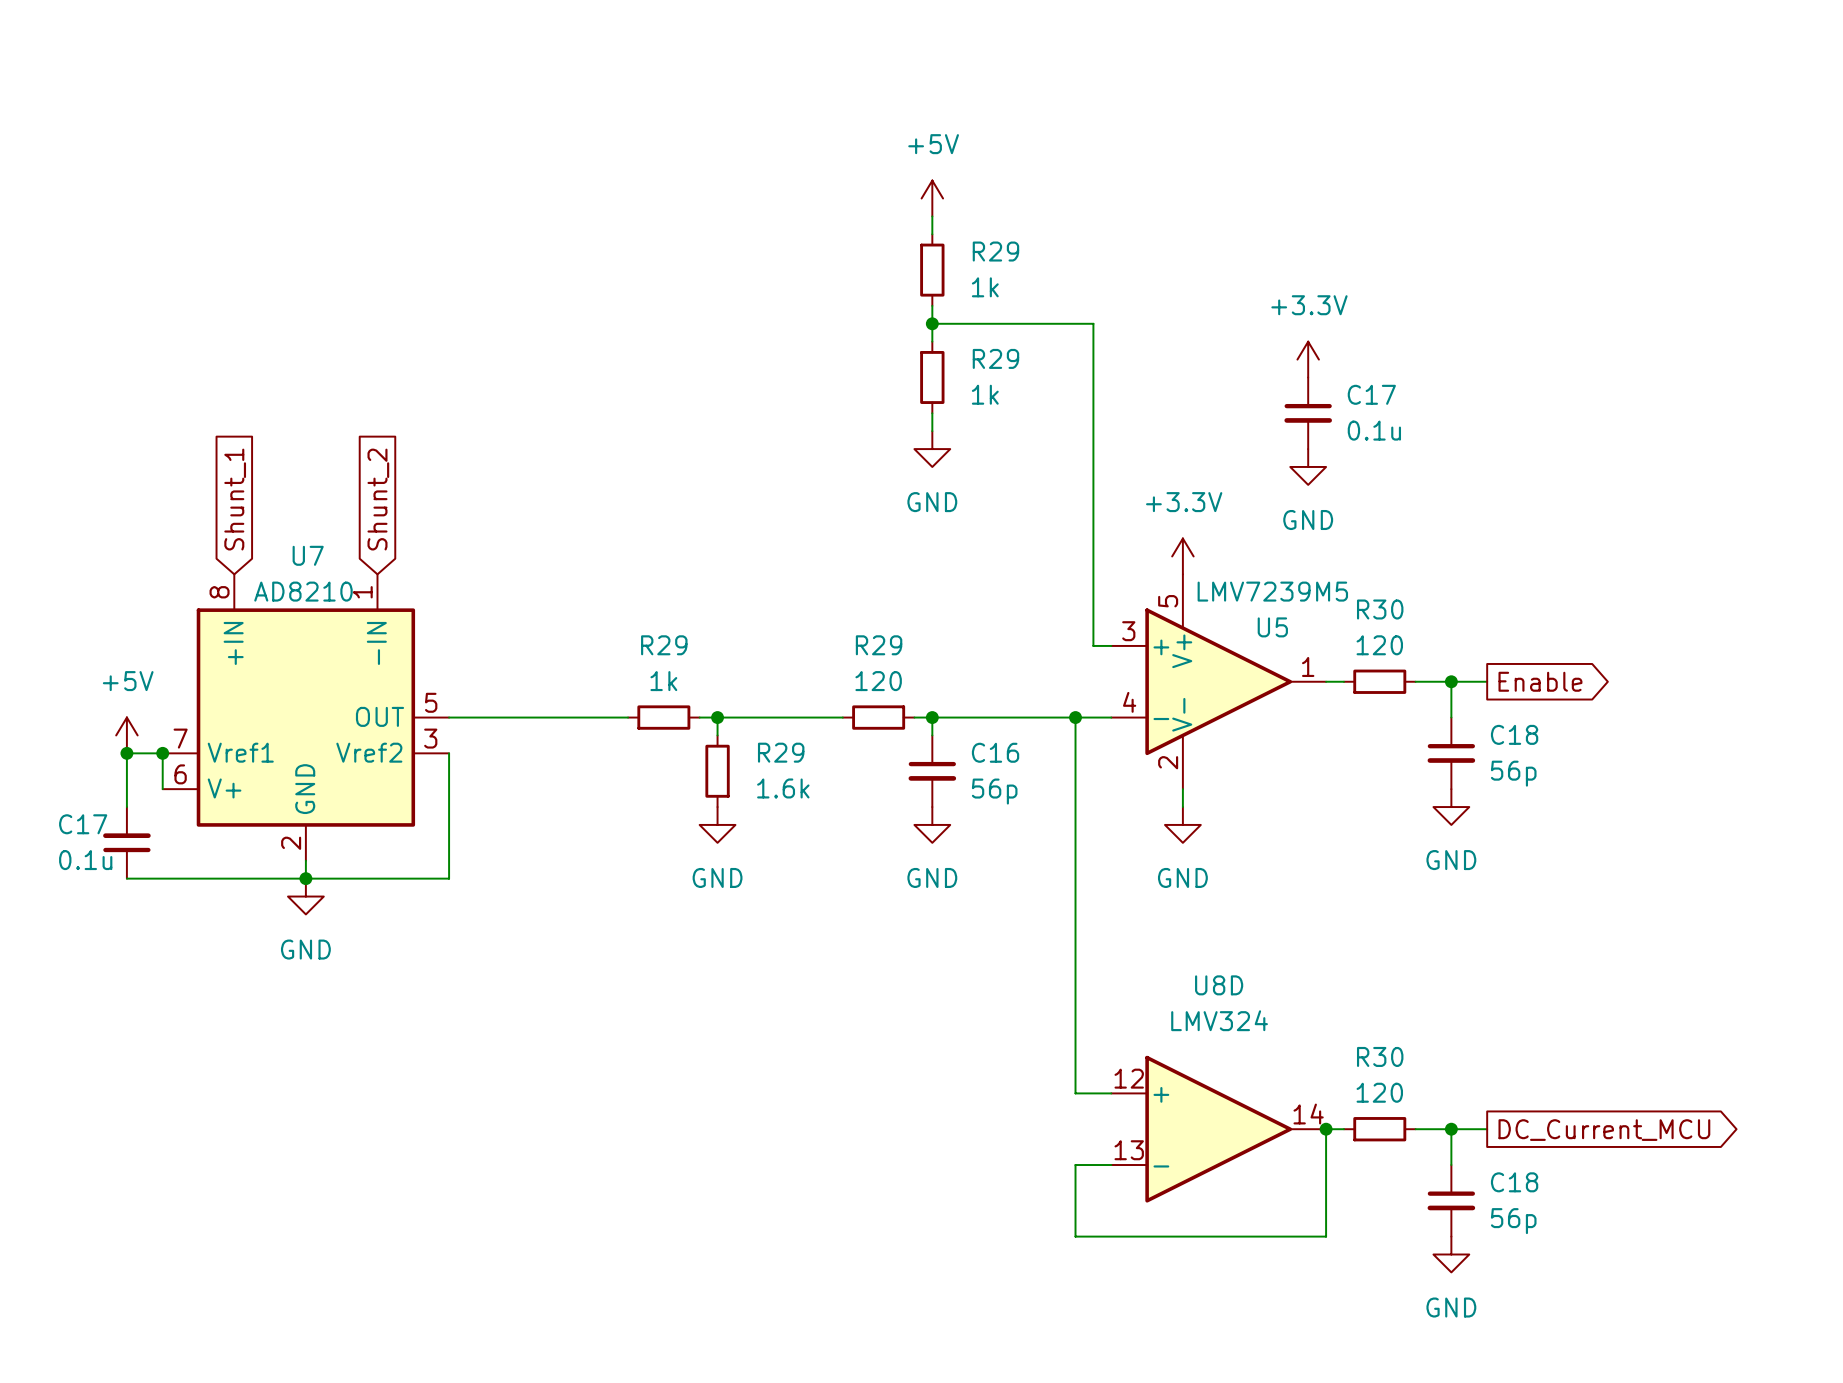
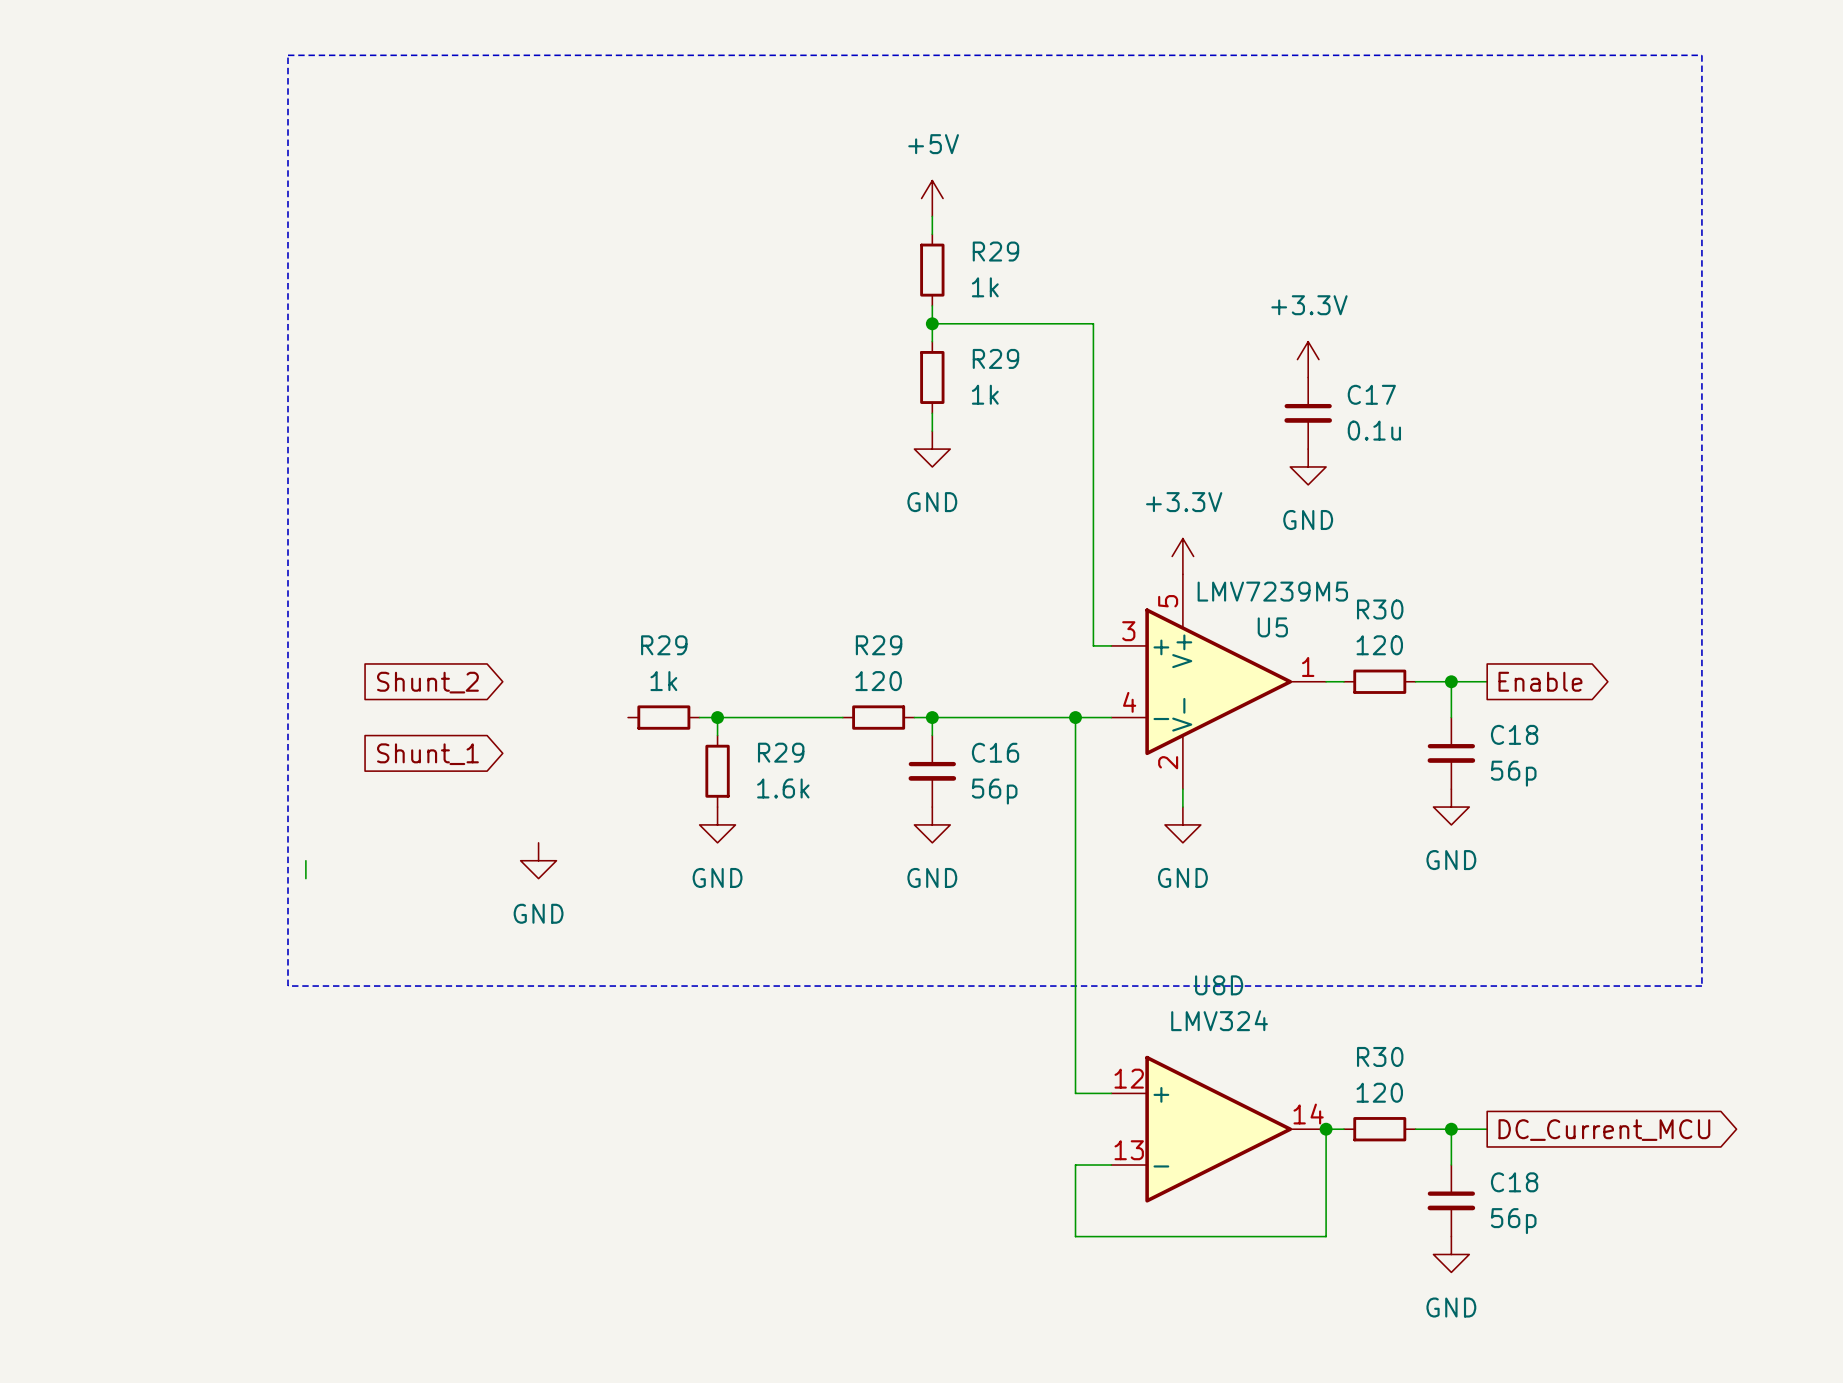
line: none -> (288, 55) (1701, 55) (1701, 986) (288, 986) (288, 55)
global label rotation: 0° (235, 499) -> 90° counterclockwise (427, 754)
global label position: Shunt_1 (235, 499) -> Shunt_1 (427, 754)
global label rotation: 0° (378, 499) -> 90° counterclockwise (427, 682)
global label position: Shunt_2 (378, 499) -> Shunt_2 (427, 682)
U7: AD8210 (305, 717) -> none
wire: (449, 717) (628, 717) -> none
power symbol: +5V (126, 735) -> none
junction: (126, 753) -> none
junction: (162, 753) -> none
wire: (449, 753) (449, 878) (126, 878) -> none
wire: (162, 789) (162, 753) (126, 753) (126, 807) -> none
C17: 0.1u (126, 842) -> none
junction: (305, 878) -> none
power symbol position: GND (305, 896) -> GND (538, 860)

